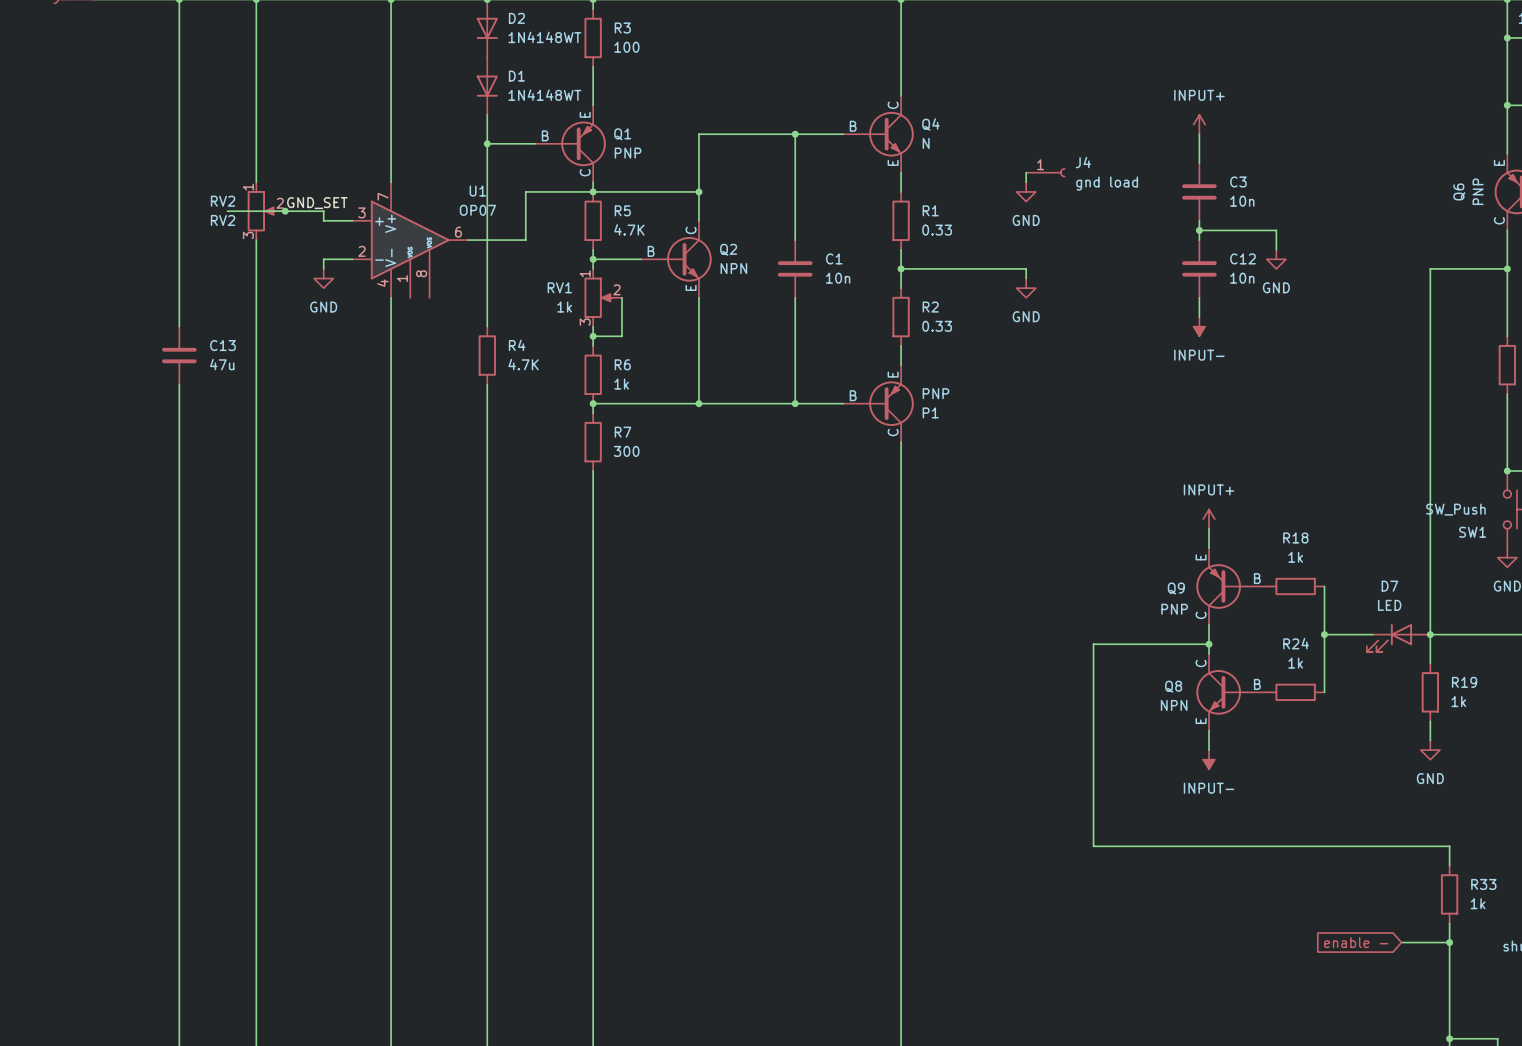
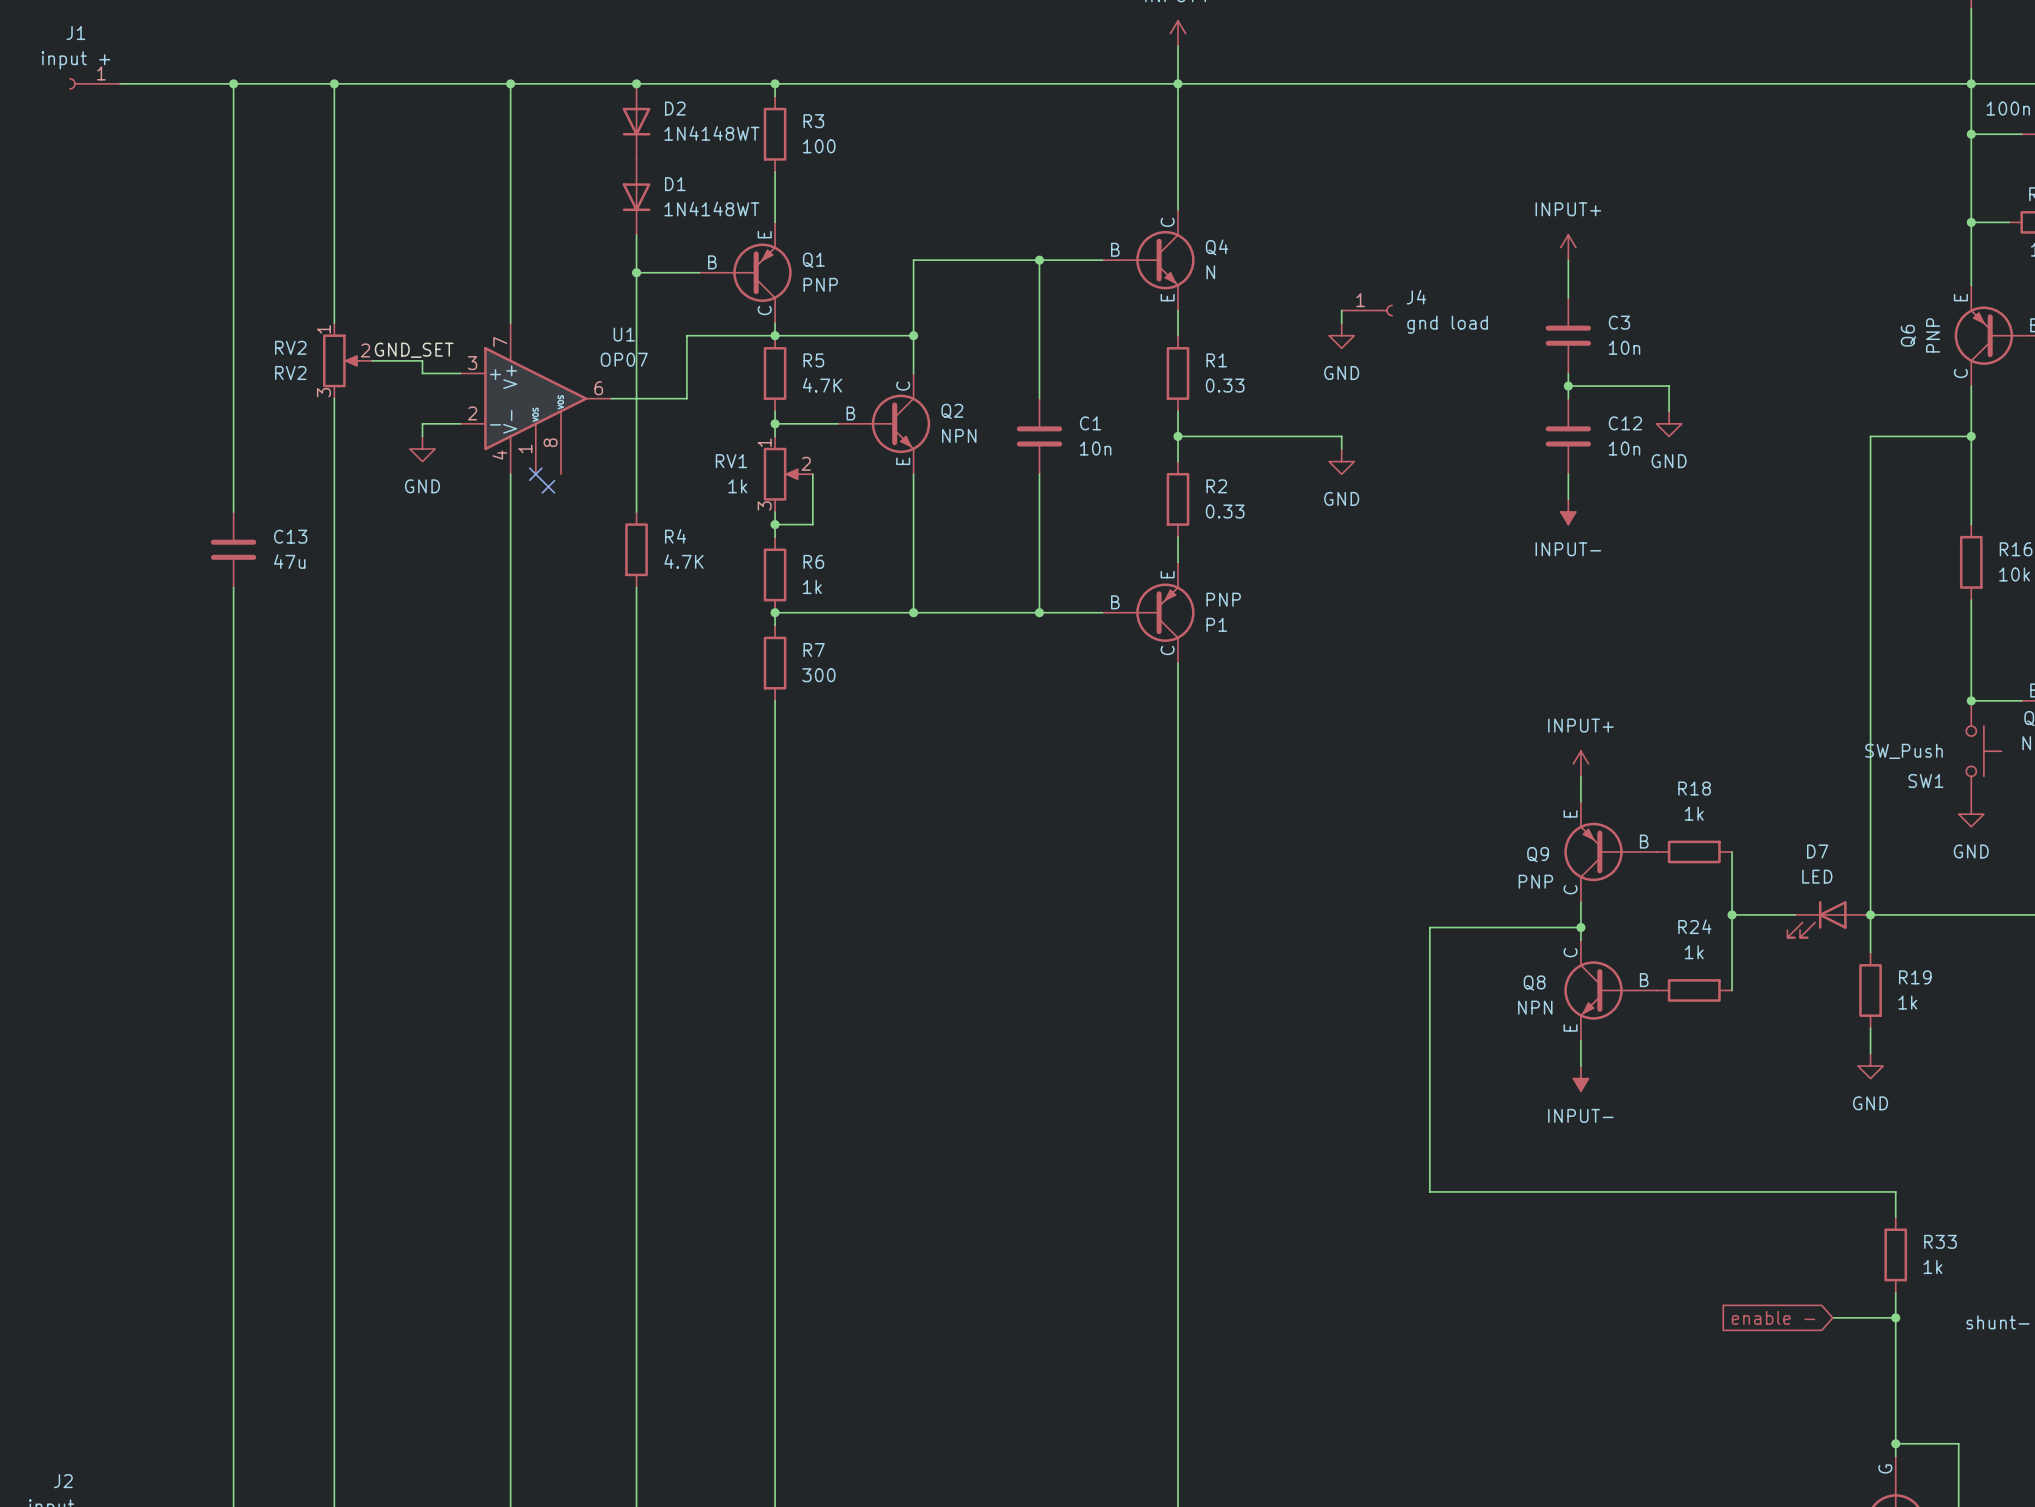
wire: (227, 211) (285, 211) -> none
junction: (285, 211) -> none
no-connect mark: none -> (535, 474)
no-connect mark: none -> (548, 486)

